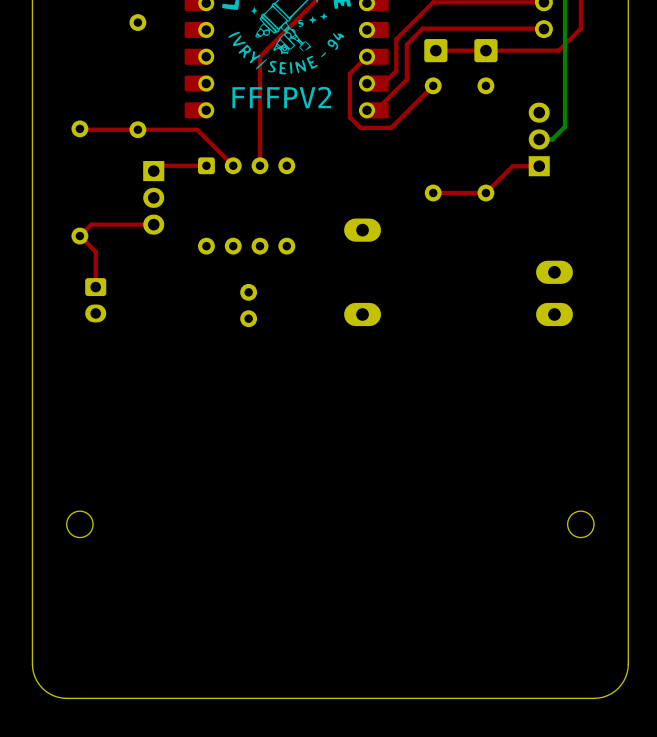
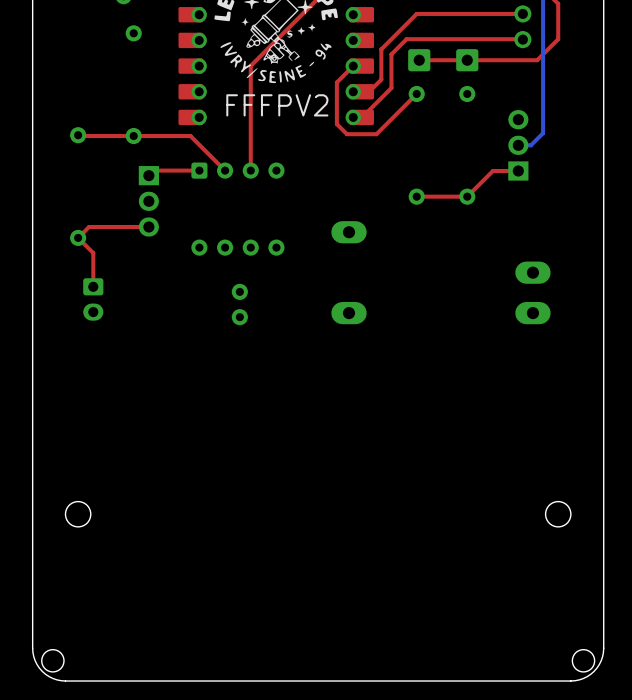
round board edge: none -> [41, 649, 65, 673]
round board edge: none -> [572, 649, 595, 673]

